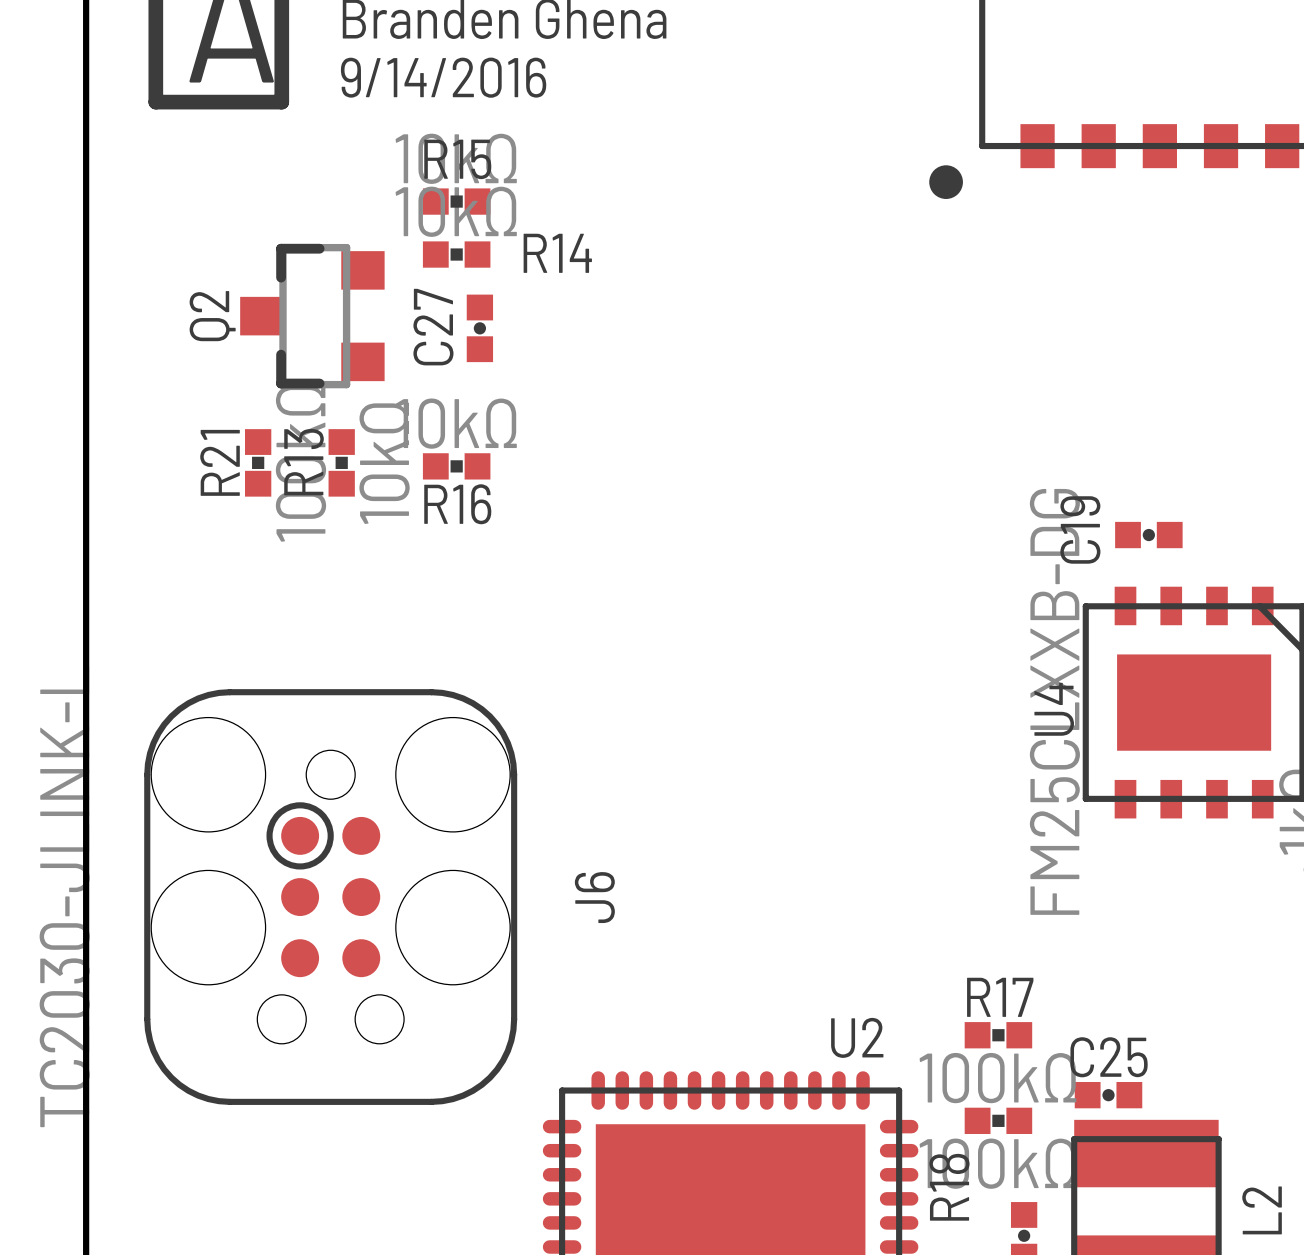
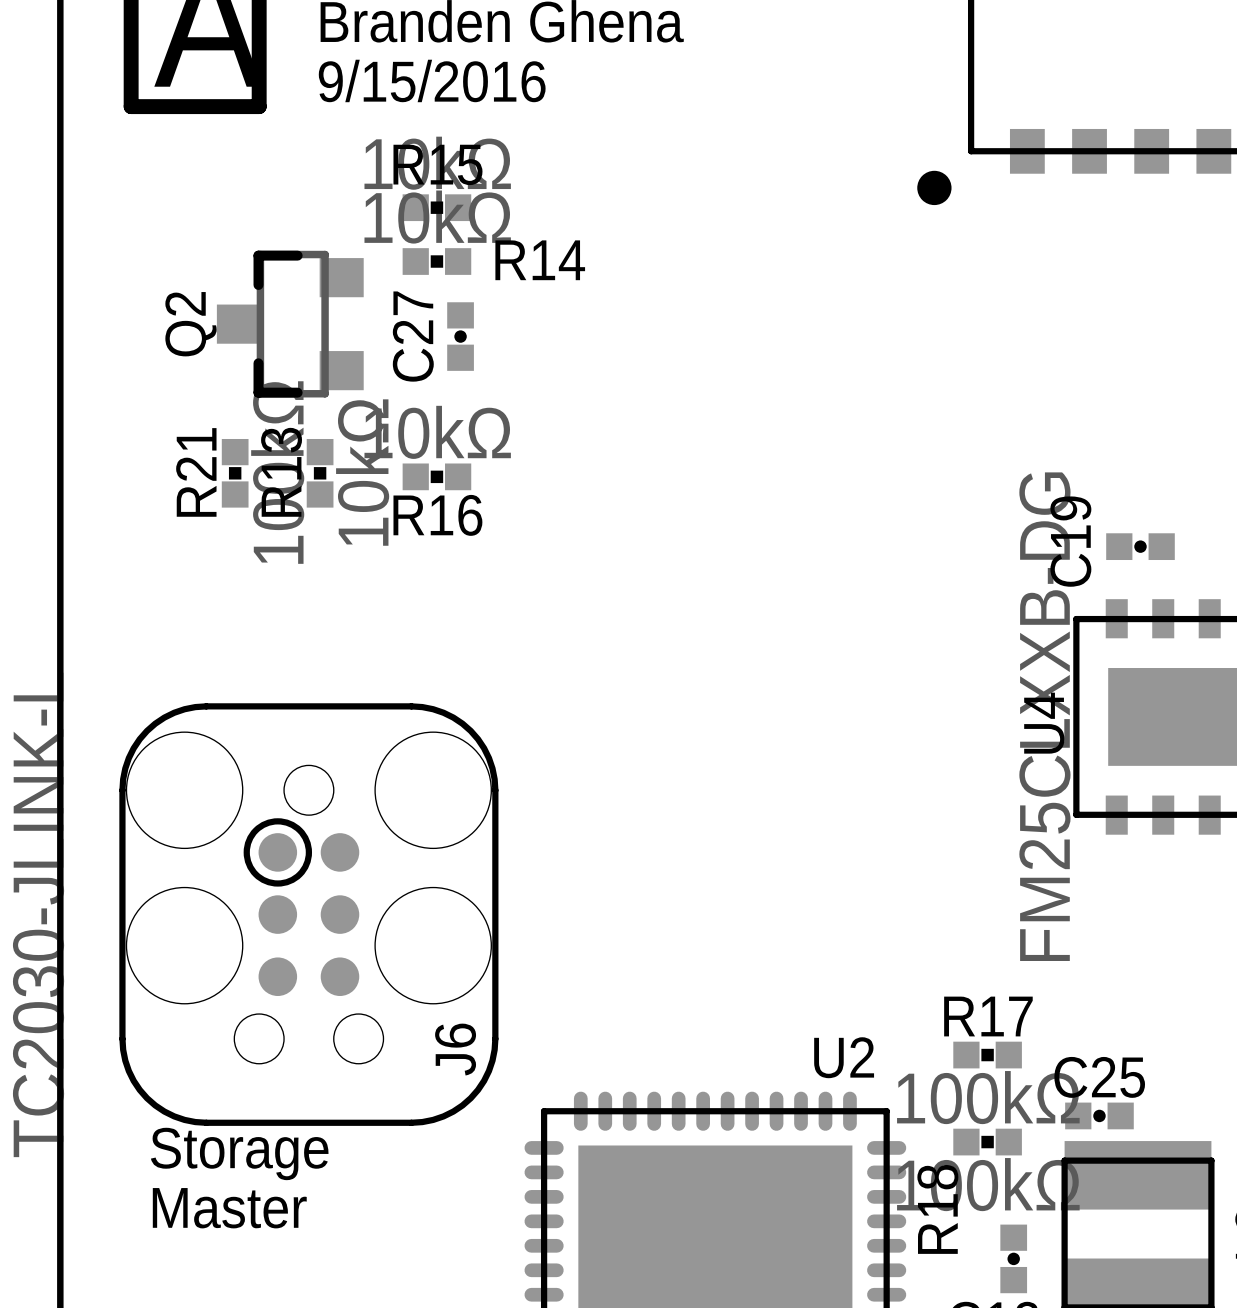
text: 9/14/2016 (443, 77) -> 9/15/2016 (432, 80)
J6 name position: J6 (594, 897) -> J6 (455, 1049)
text: none -> Storage (239, 1153)
text: none -> Master (229, 1208)

